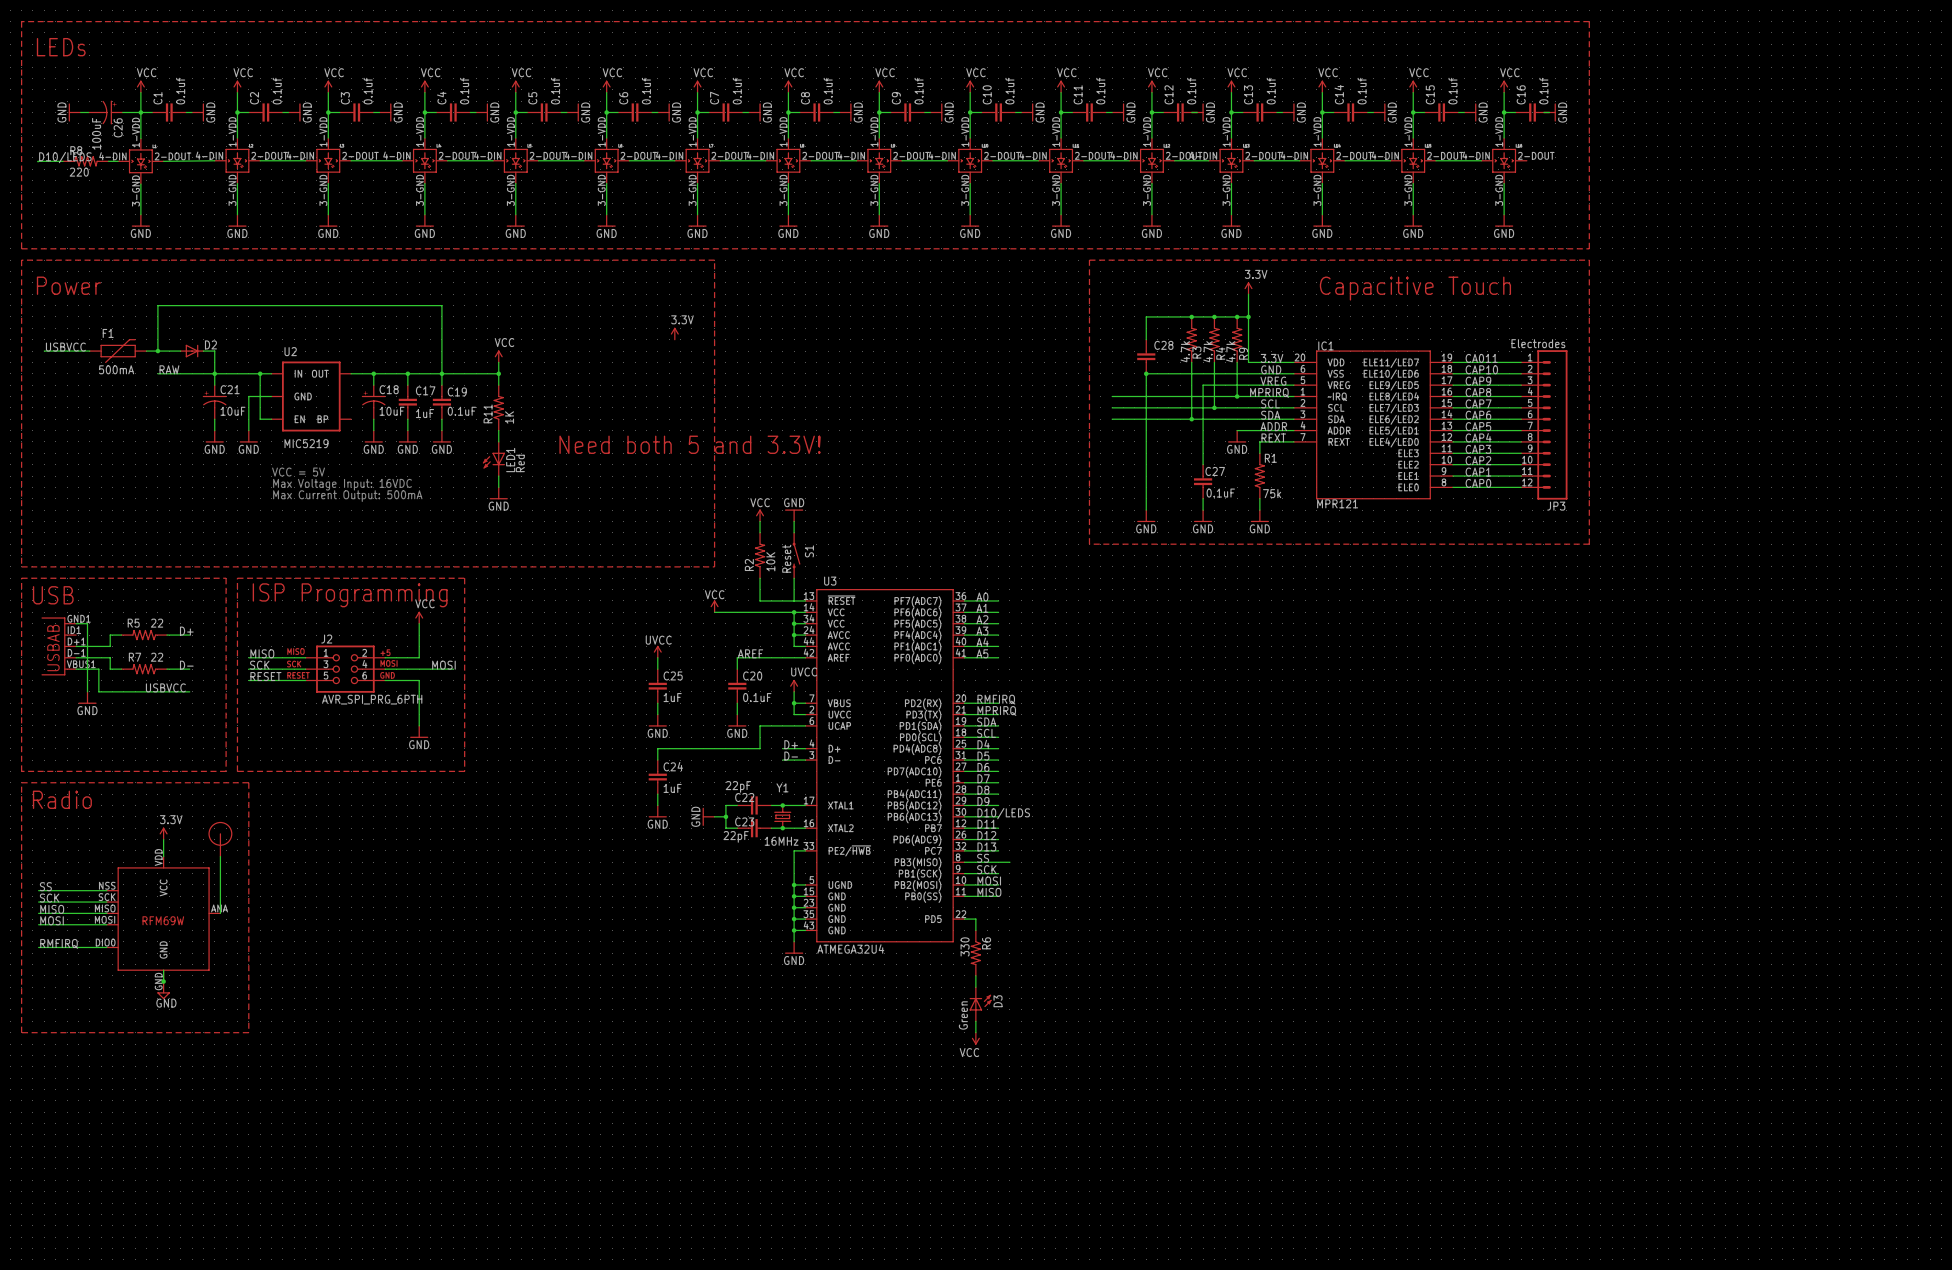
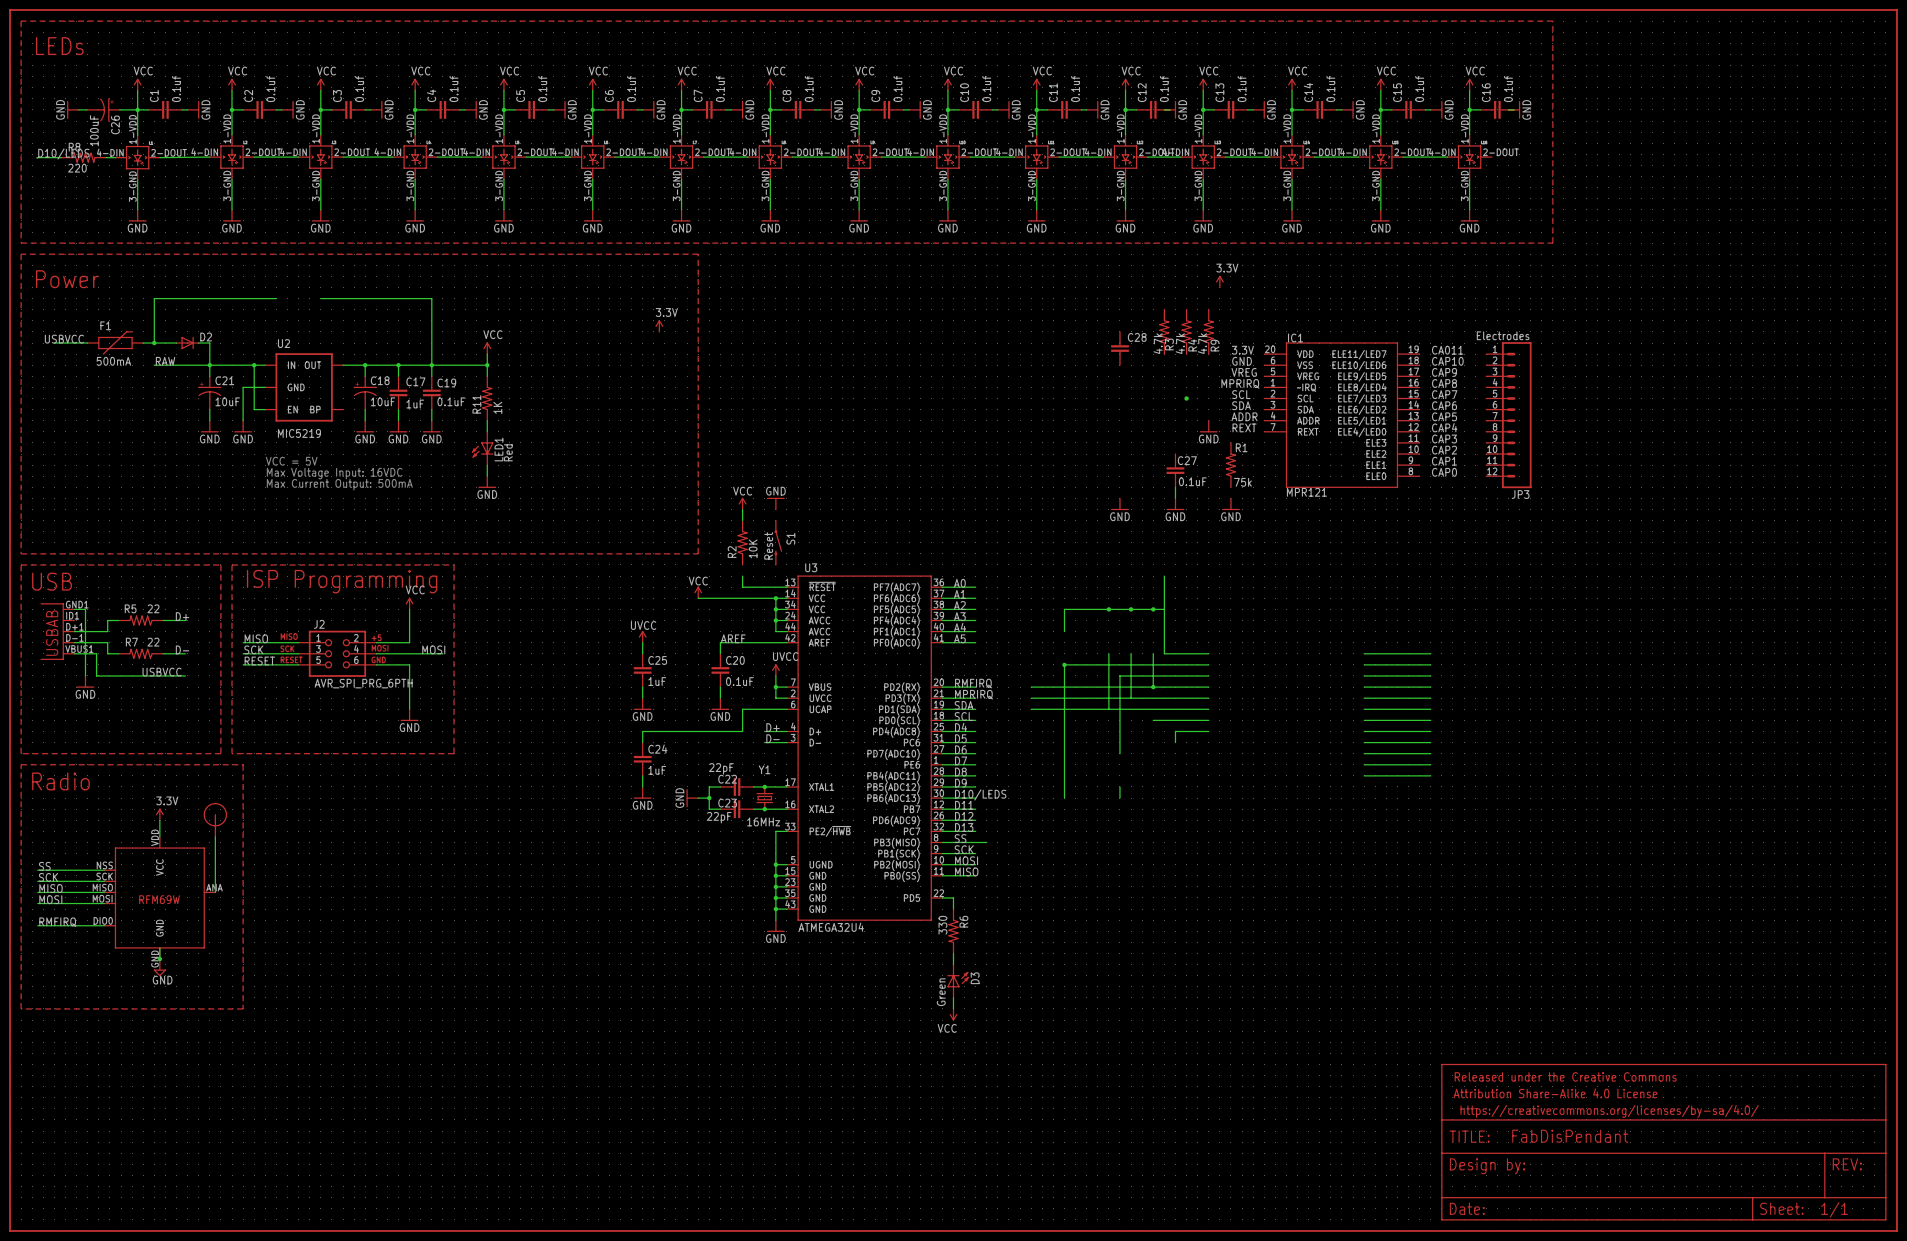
line: (1089, 260) (1589, 260) (1589, 544) (1089, 544) (1089, 260) -> none
text: Capacitive Touch (1415, 288) -> none
wire: (1248, 294) (1248, 362) (1293, 362) -> none
wire: (282, 305) (328, 305) -> none
junction: (1191, 316) -> none
junction: (1214, 316) -> none
junction: (1237, 316) -> none
wire: (1248, 316) (1146, 316) (1146, 339) -> none
junction: (1248, 316) -> none
wire: (44, 351) (55, 351) -> none
wire: (1191, 362) (1191, 419) -> none
wire: (1214, 362) (1214, 407) -> none
wire: (1237, 362) (1237, 396) -> none
wire: (1453, 362) (1521, 362) -> none
junction: (1146, 373) -> none
wire: (1293, 373) (1146, 373) (1146, 510) -> none
wire: (1453, 373) (1521, 373) -> none
wire: (1293, 385) (1203, 385) (1203, 464) -> none
wire: (1453, 385) (1521, 385) -> none
wire: (1112, 396) (1293, 396) -> none
junction: (1237, 396) -> none
wire: (1453, 396) (1521, 396) -> none
wire: (1112, 407) (1293, 407) -> none
wire: (1453, 407) (1521, 407) -> none
wire: (1112, 419) (1293, 419) -> none
junction: (1191, 419) -> none
wire: (1453, 419) (1521, 419) -> none
wire: (1237, 430) (1293, 430) -> none
wire: (1453, 430) (1521, 430) -> none
wire: (1293, 441) (1259, 441) (1259, 453) -> none
wire: (1453, 441) (1521, 441) -> none
text: Need both 5 and 3.3V! (690, 444) -> none
wire: (1453, 453) (1521, 453) -> none
wire: (1453, 464) (1521, 464) -> none
wire: (1453, 476) (1521, 476) -> none
wire: (1453, 487) (1521, 487) -> none
wire: (1259, 498) (1259, 510) -> none
wire: (794, 521) (794, 532) -> none
wire: (760, 578) (760, 589) -> none
wire: (794, 578) (794, 600) -> none
wire: none -> (1164, 576) (1164, 653) (1208, 653)
junction: none -> (1108, 609)
junction: none -> (1131, 609)
junction: none -> (1153, 609)
wire: none -> (1164, 609) (1064, 609) (1064, 631)
part: none -> (953, 620)
wire: none -> (1108, 653) (1108, 709)
wire: none -> (1131, 653) (1131, 698)
wire: none -> (1153, 653) (1153, 687)
wire: none -> (1364, 653) (1430, 653)
junction: none -> (1064, 664)
wire: none -> (1208, 664) (1064, 664) (1064, 798)
wire: none -> (1364, 664) (1430, 664)
wire: none -> (1208, 675) (1119, 675) (1119, 753)
wire: none -> (1364, 675) (1430, 675)
wire: none -> (1031, 687) (1208, 687)
junction: none -> (1153, 687)
wire: none -> (1364, 687) (1430, 687)
wire: none -> (1031, 698) (1208, 698)
wire: none -> (1364, 698) (1430, 698)
wire: none -> (1031, 709) (1208, 709)
wire: none -> (1364, 709) (1430, 709)
wire: none -> (1153, 720) (1208, 720)
wire: none -> (1364, 720) (1430, 720)
wire: none -> (1208, 731) (1175, 731) (1175, 742)
wire: none -> (1364, 731) (1430, 731)
wire: none -> (1364, 742) (1430, 742)
wire: none -> (1364, 753) (1430, 753)
wire: none -> (1364, 764) (1430, 764)
wire: none -> (1364, 775) (1430, 775)
wire: none -> (1119, 786) (1119, 798)
part: none -> (1663, 1142)

